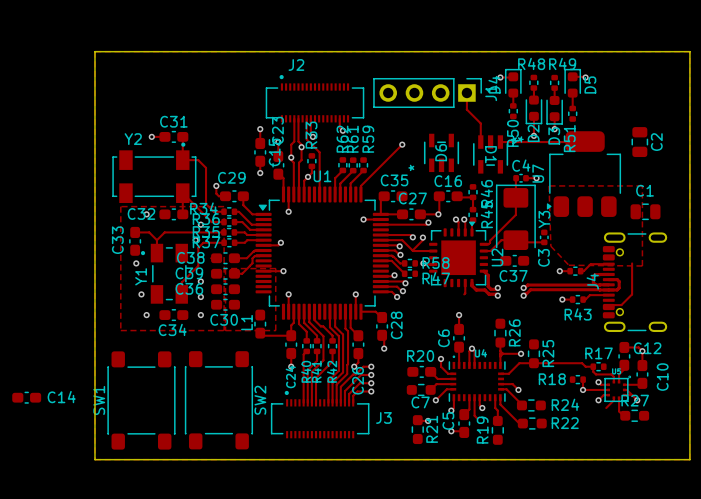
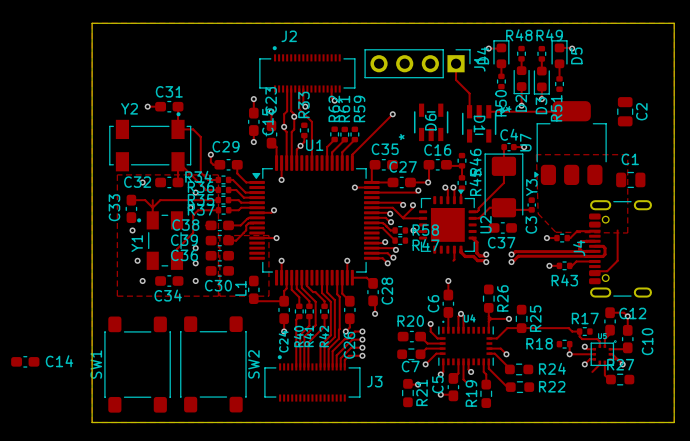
track: none -> (152, 200) (152, 207)

